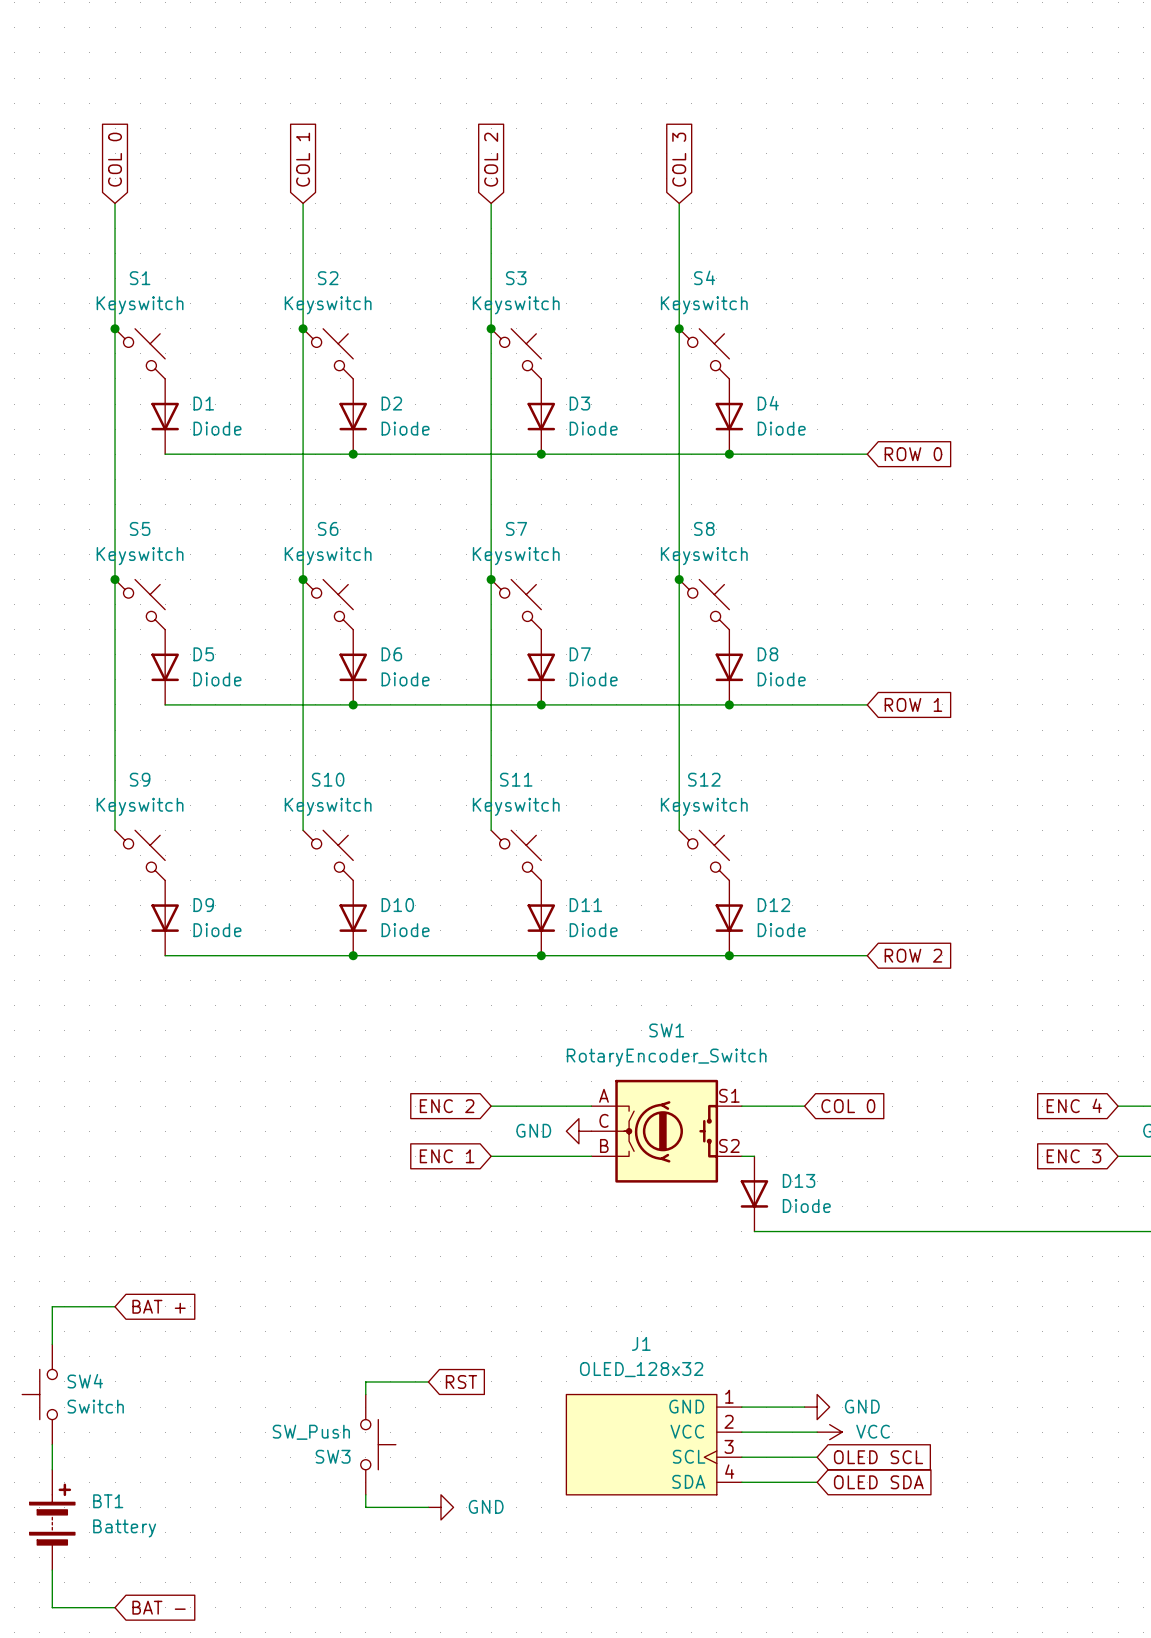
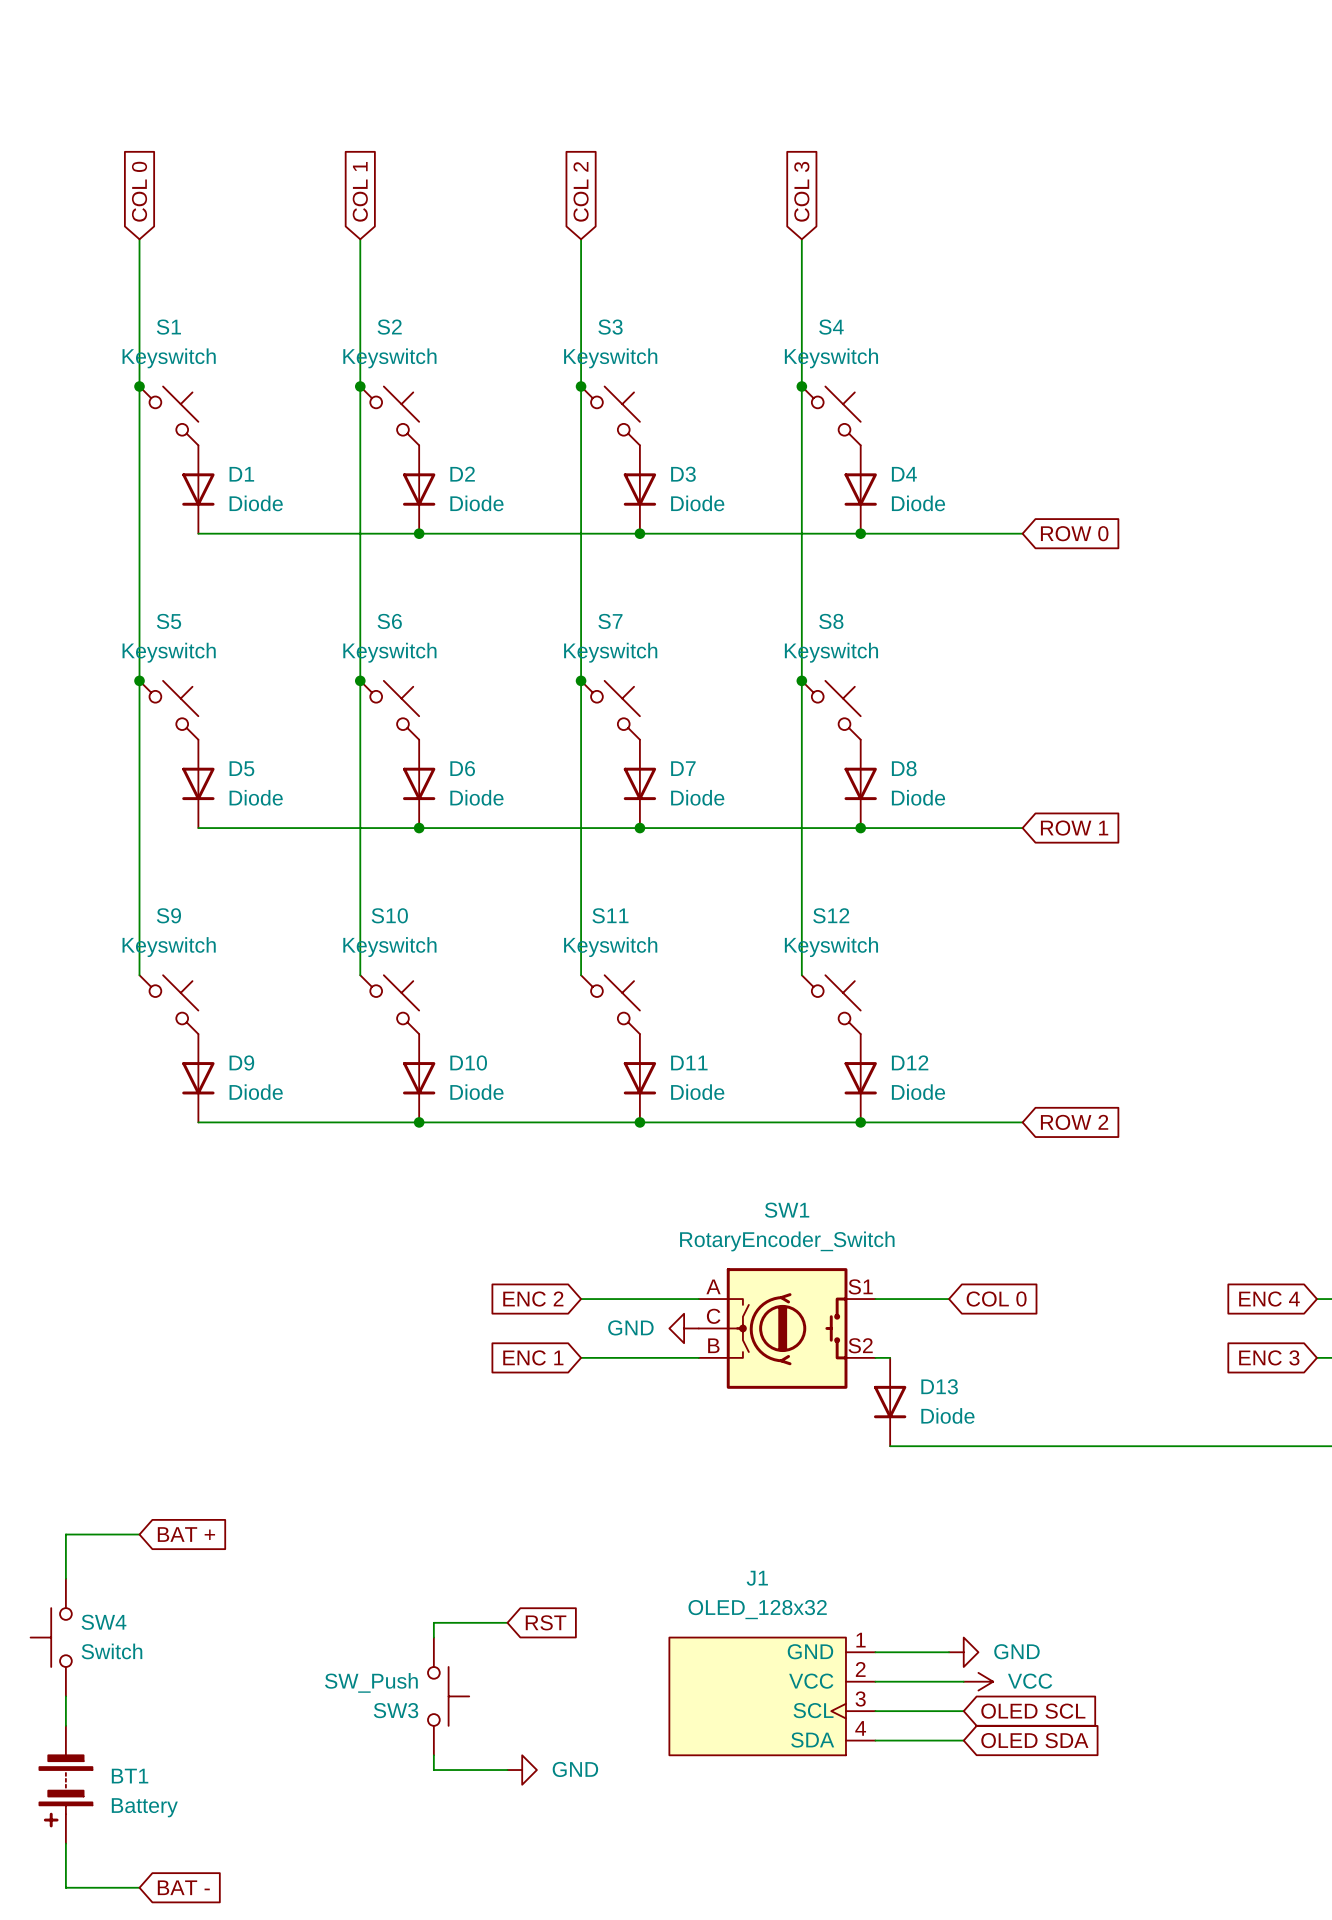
BT1 rotation: 0° (52, 1514) -> 180° (65, 1791)

